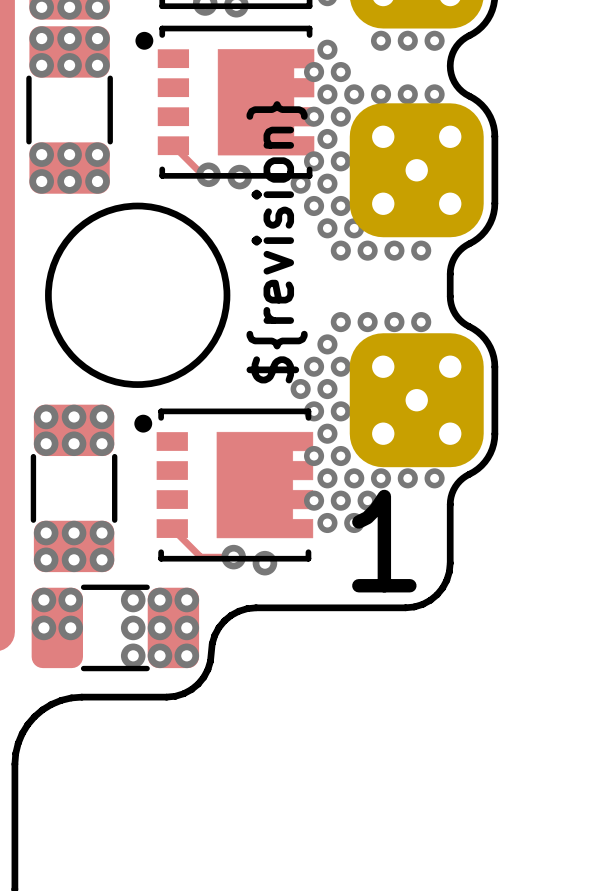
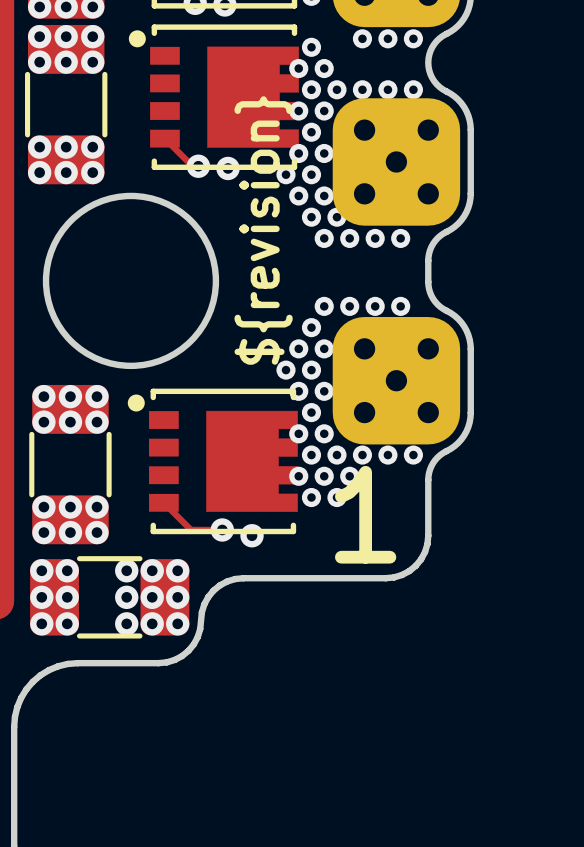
via: none -> (41, 623)
via: none -> (67, 623)

